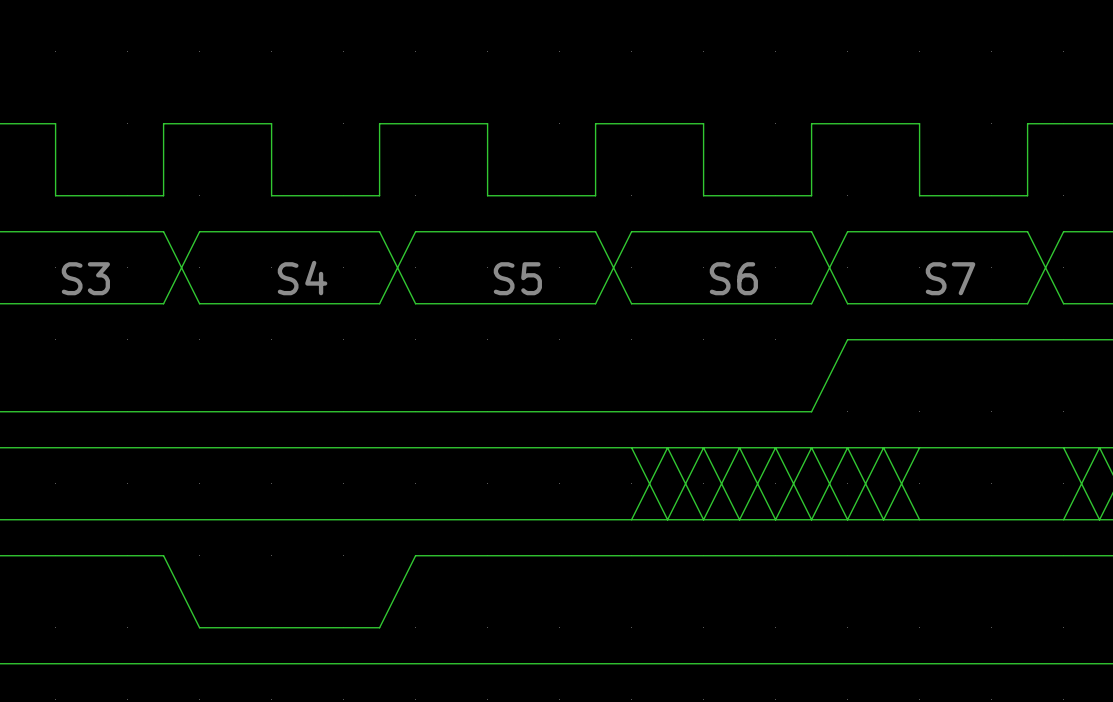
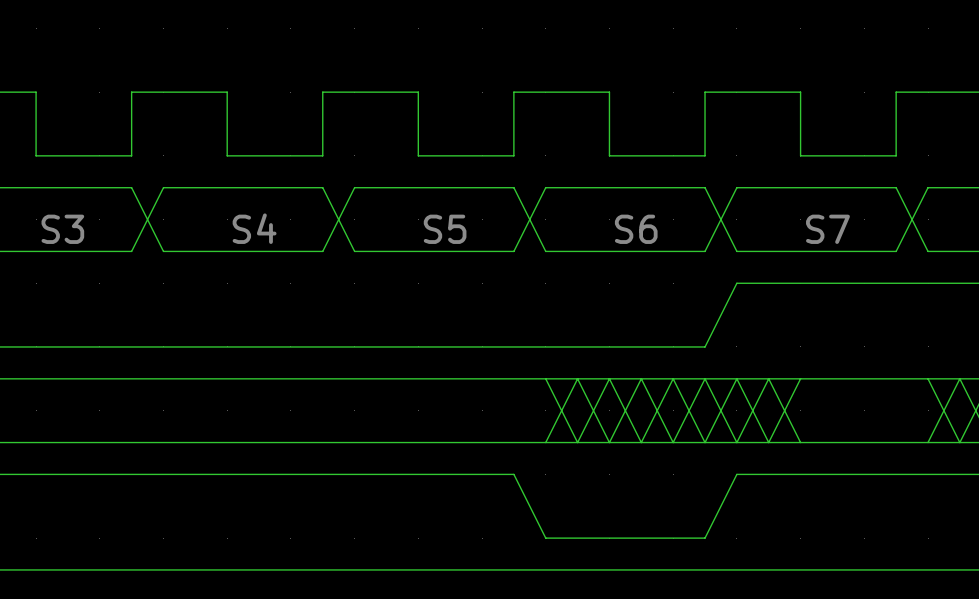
wire: (163, 555) (199, 627) (379, 627) (415, 555) -> (131, 474) (354, 474)
wire: (595, 555) (847, 555) -> (513, 474) (545, 538) (705, 538) (736, 474)

